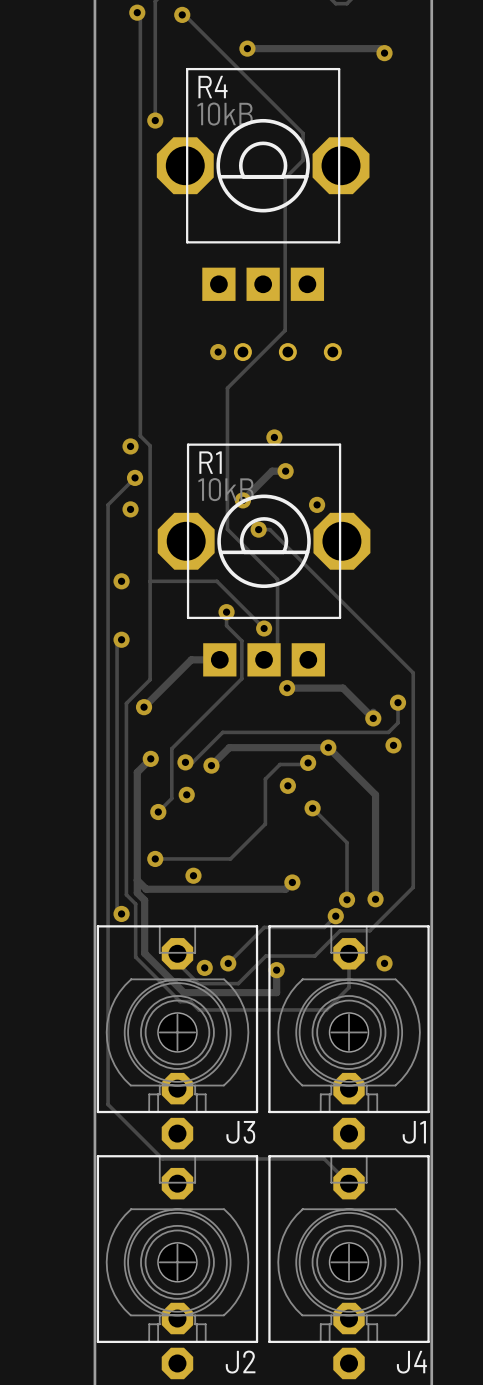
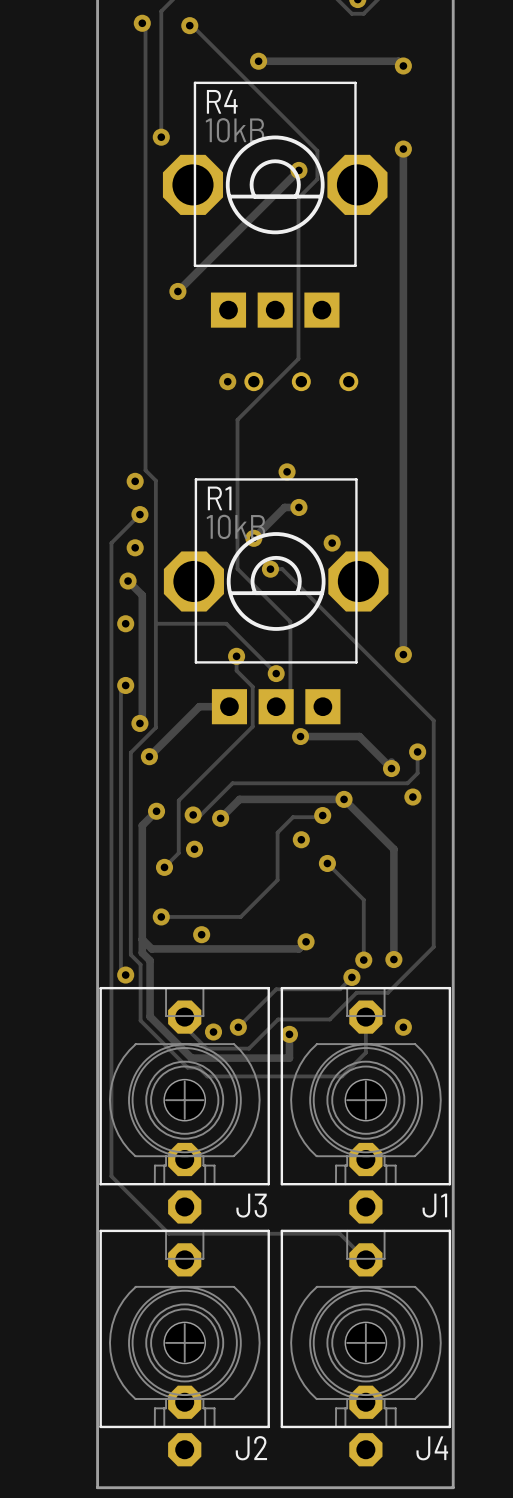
track: none -> (403, 149) (403, 654)
via: none -> (403, 149)
track: none -> (298, 170) (177, 291)
via: none -> (298, 170)
via: none -> (177, 291)
track: none -> (128, 581) (142, 595) (142, 721) (139, 723)
via: none -> (128, 581)
via: none -> (403, 654)
via: none -> (139, 723)

